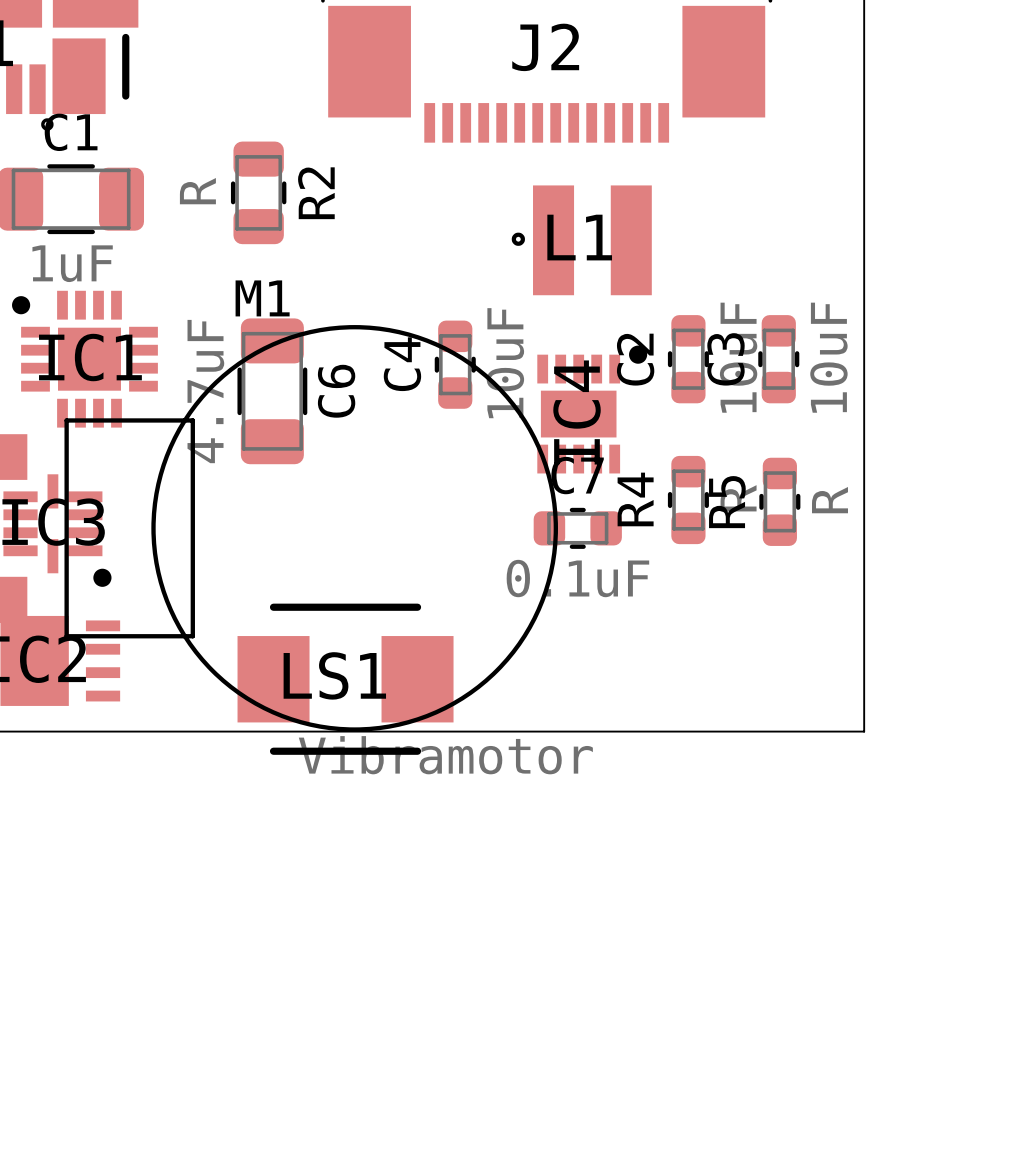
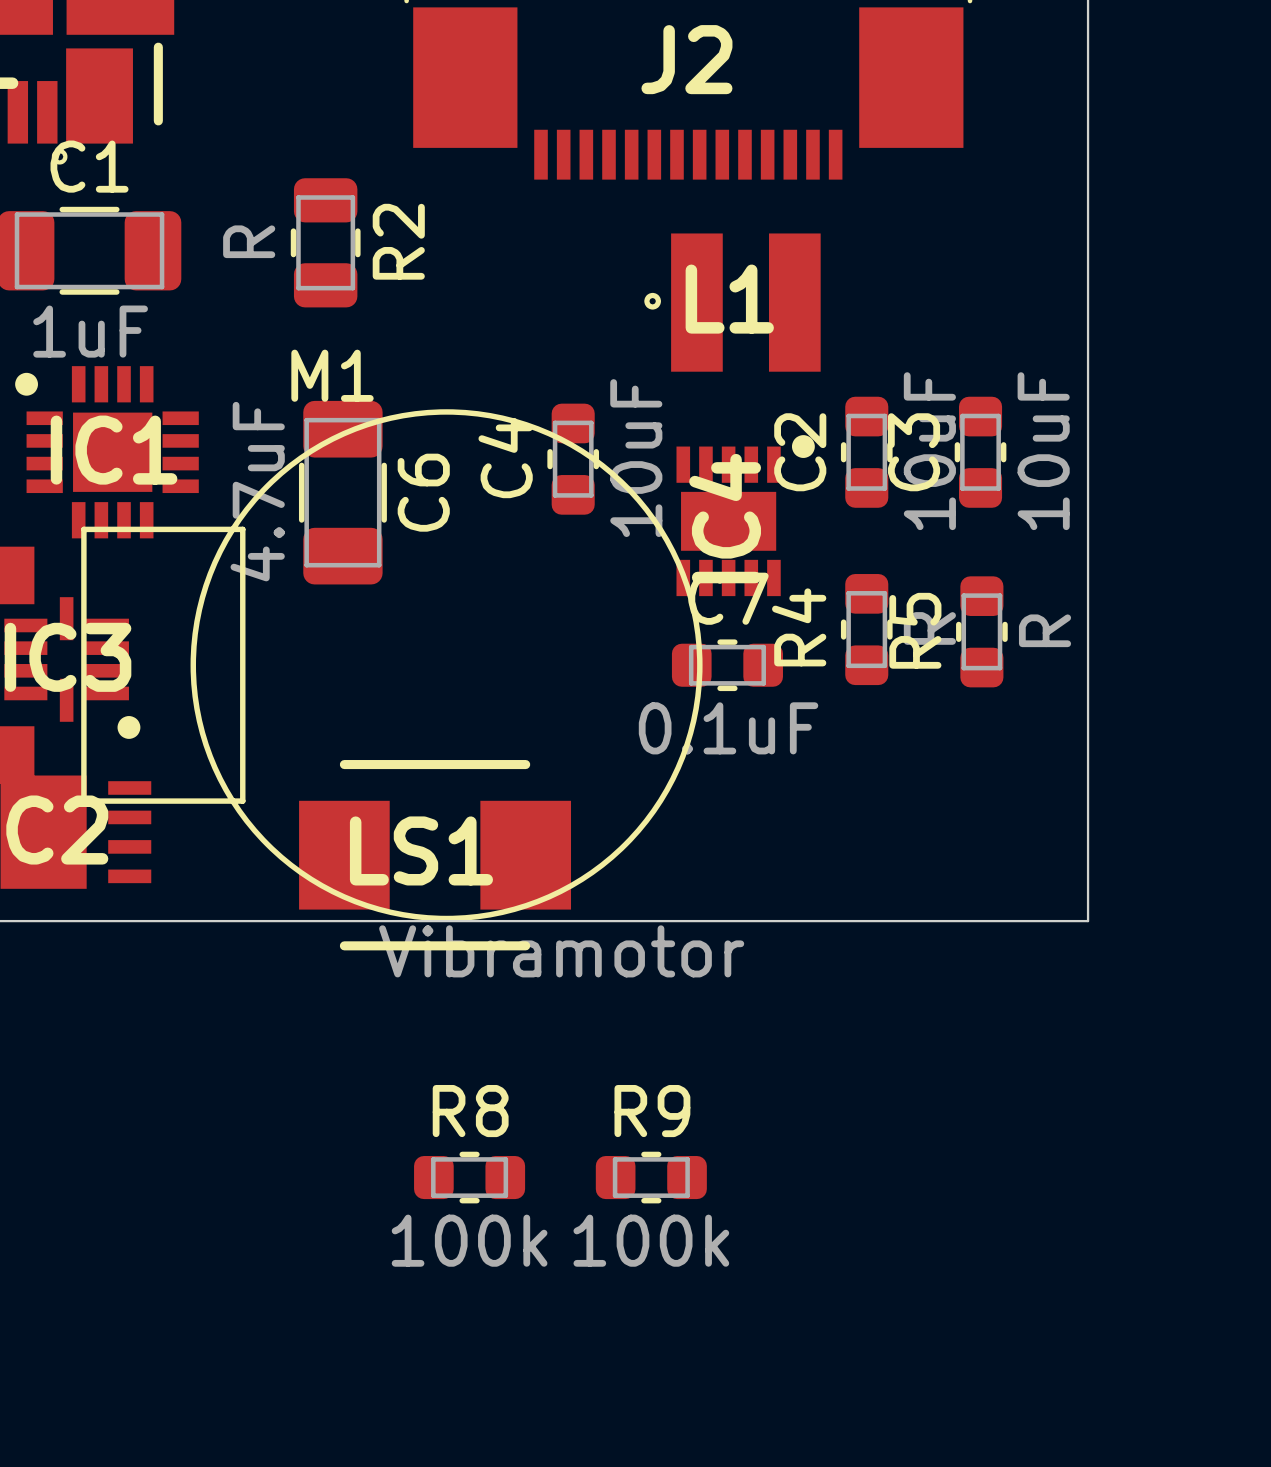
R8: none -> 100k (469, 1177)
R9: none -> 100k (651, 1177)

